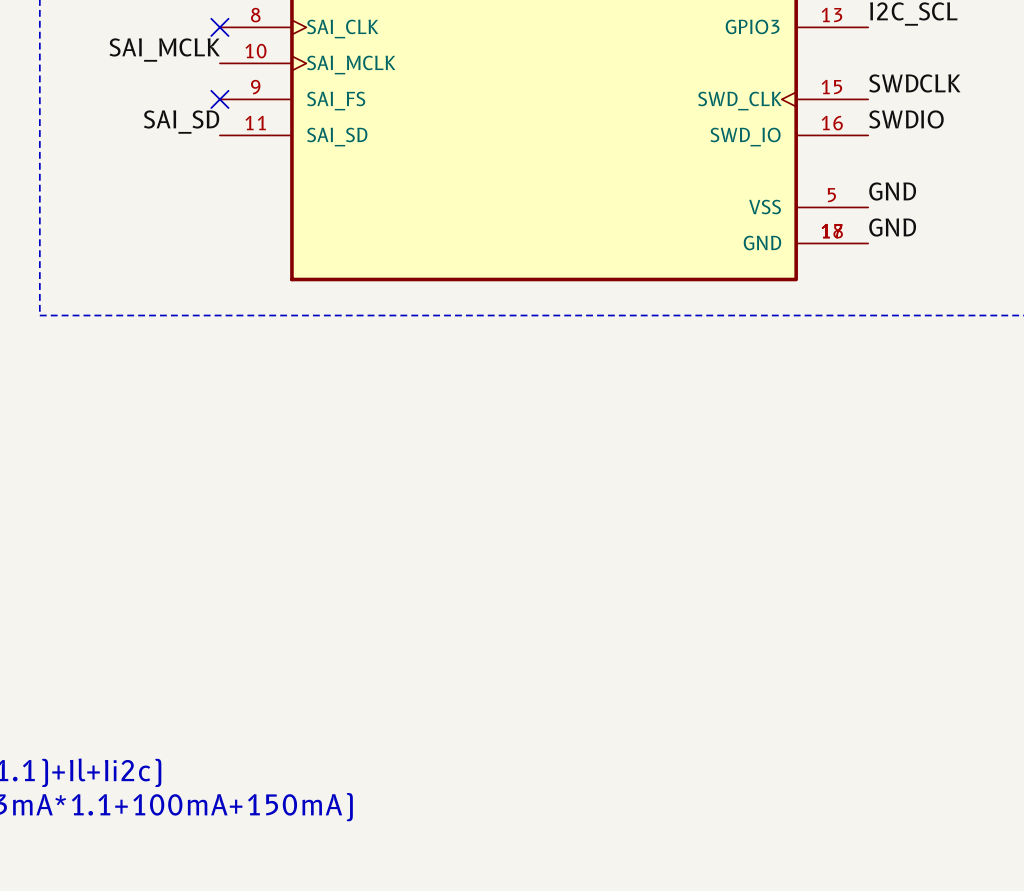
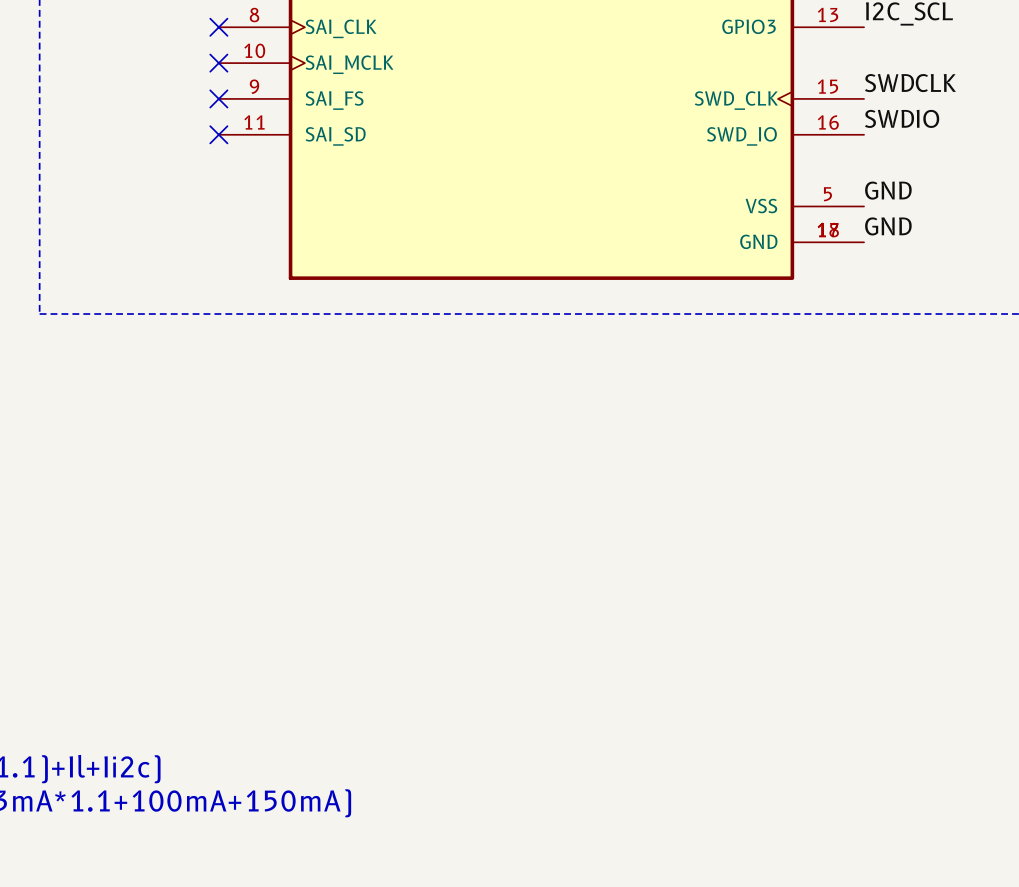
label: SAI_MCLK (164, 50) -> none
no-connect mark: none -> (218, 63)
label: SAI_SD (181, 122) -> none
no-connect mark: none -> (218, 134)

